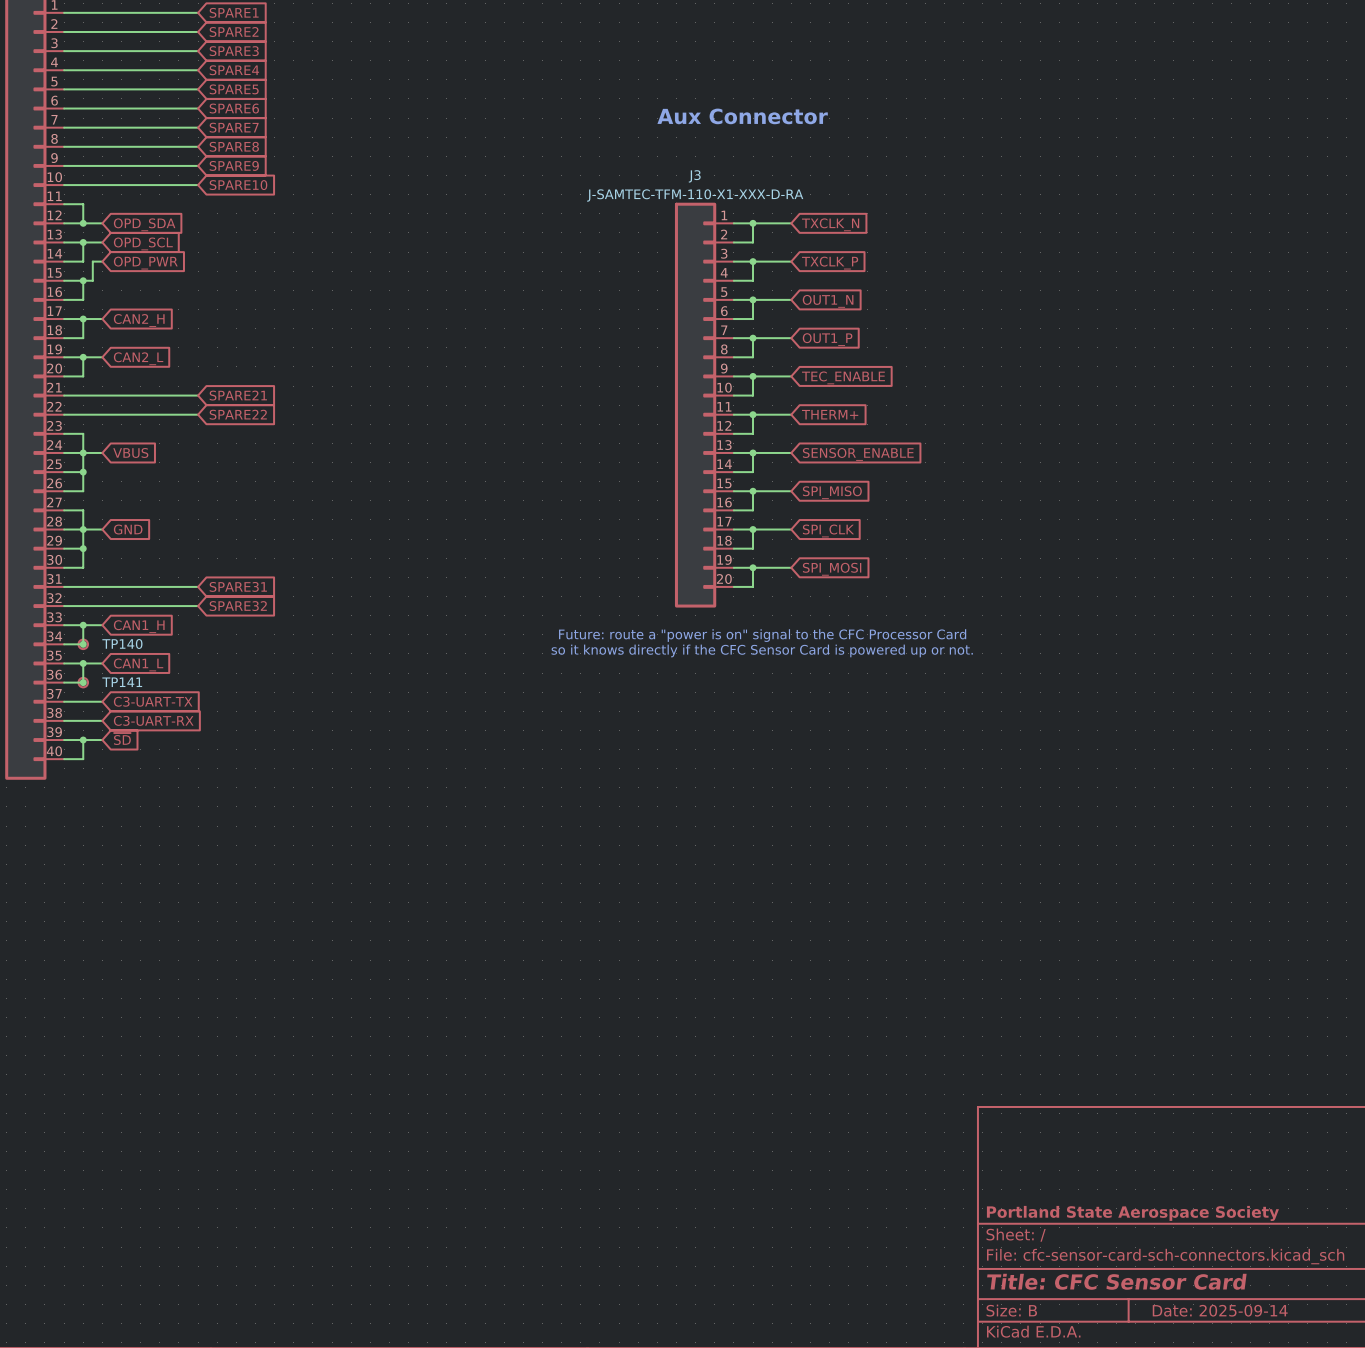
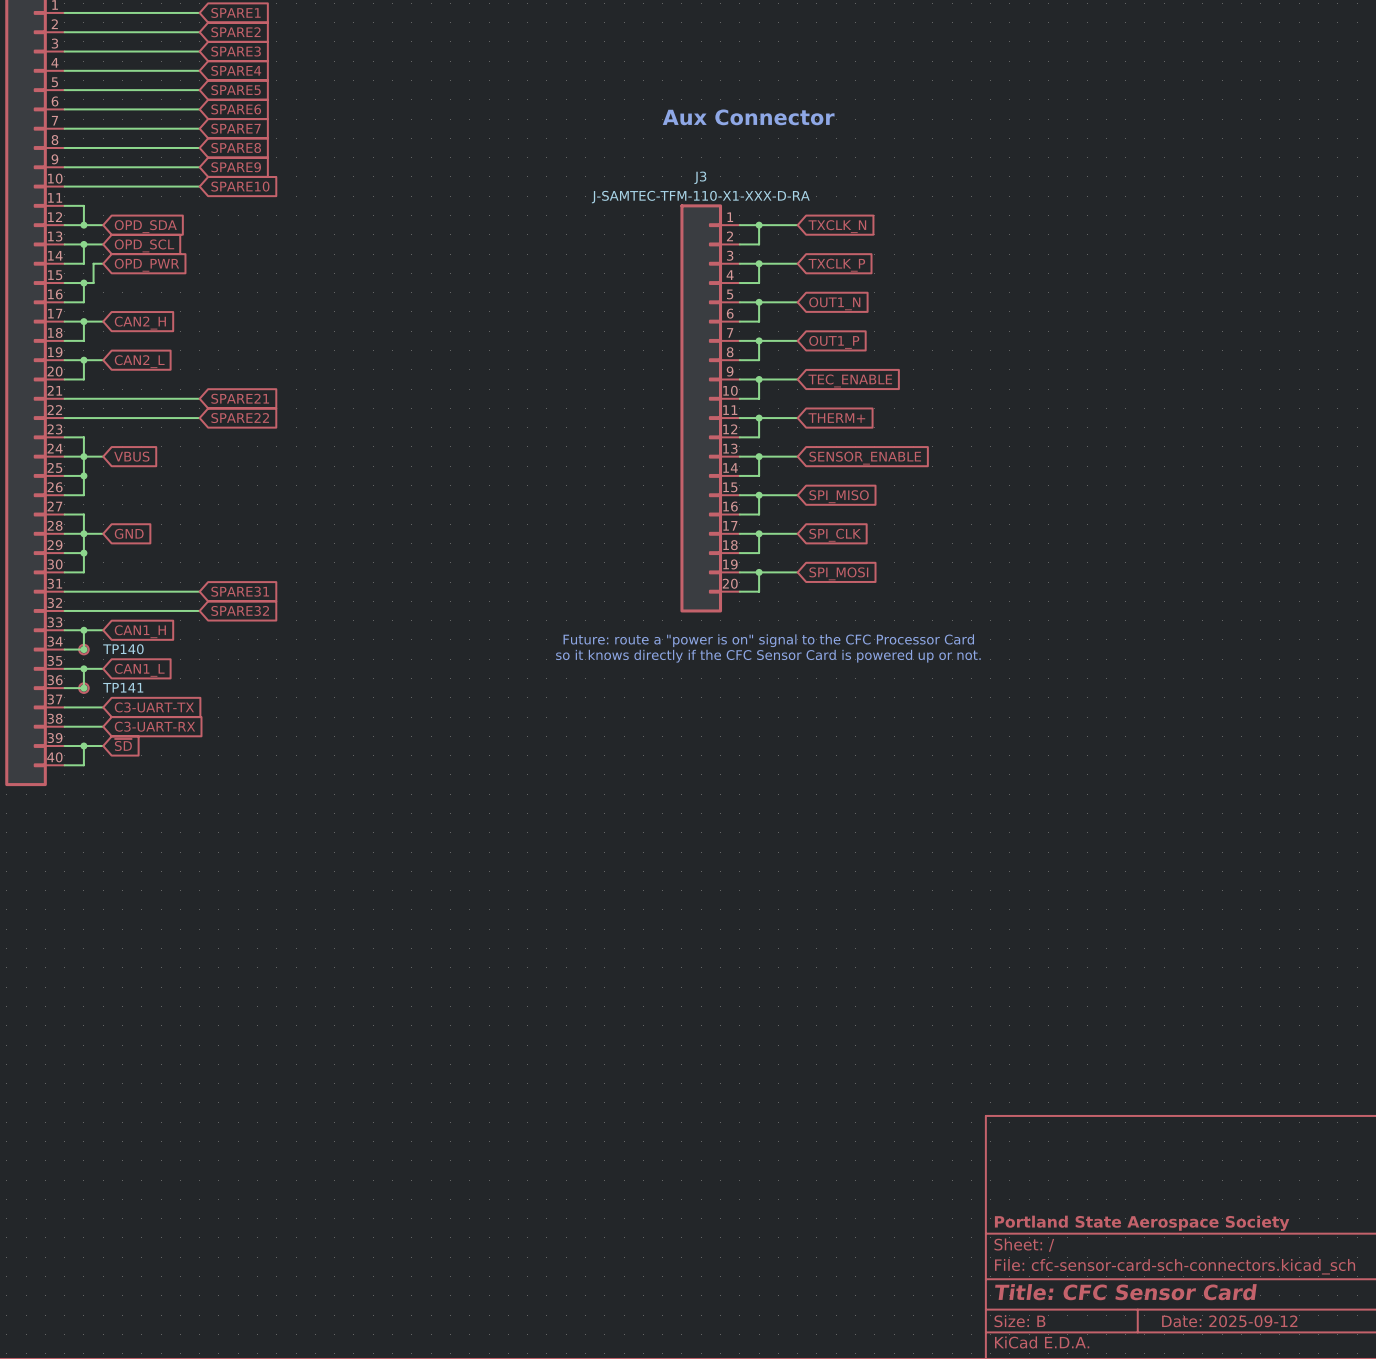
title block: Date: 2025-09-14 (1220, 1310) -> Date: 2025-09-12 (1229, 1321)

